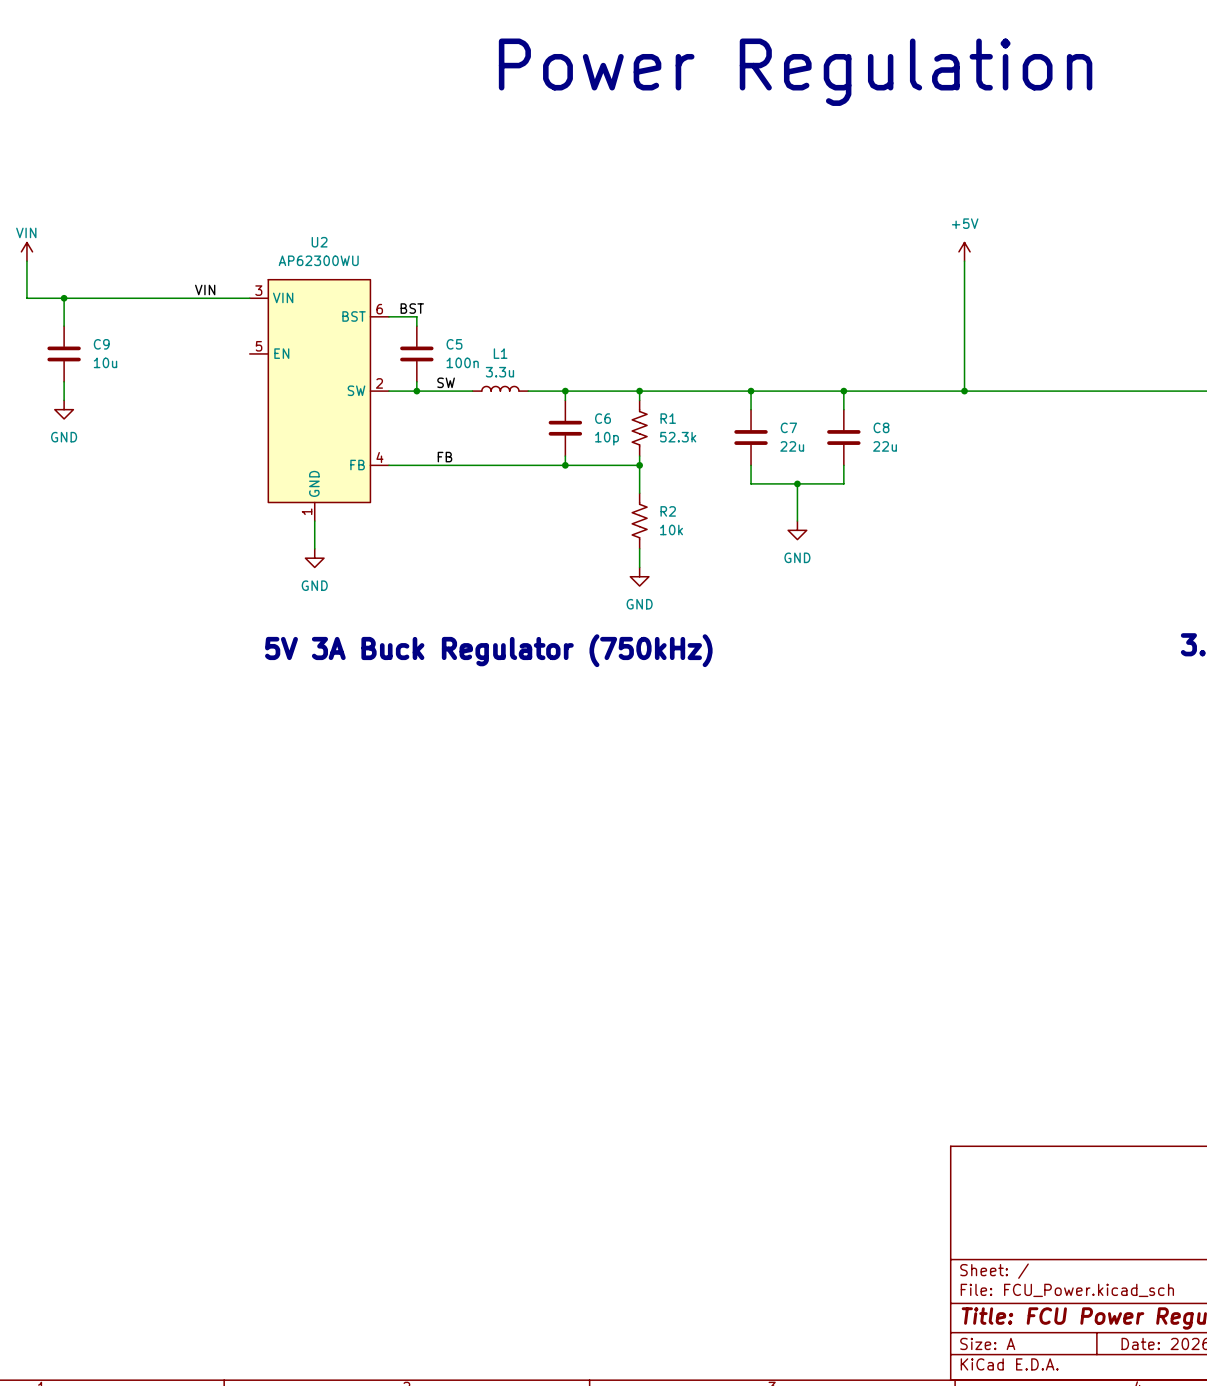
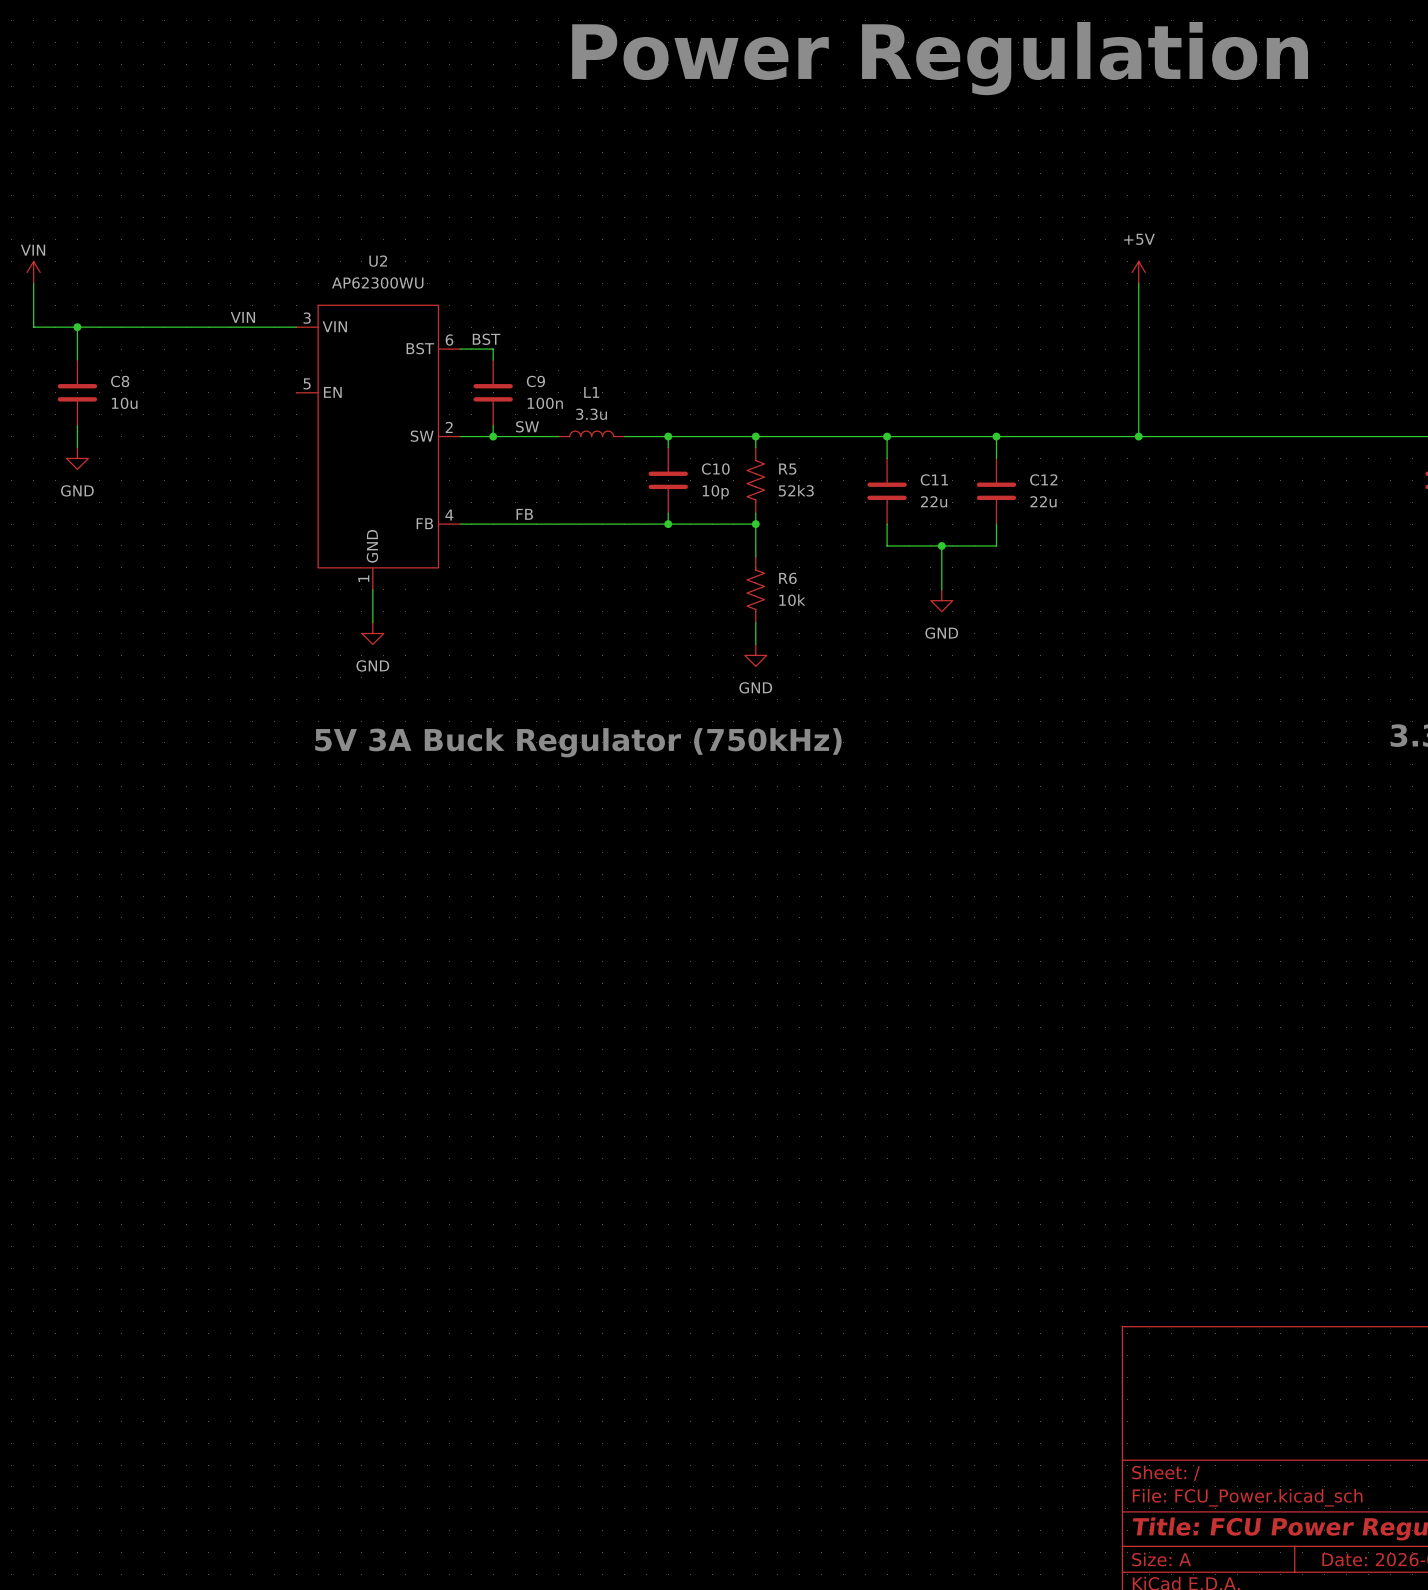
C9 name: C9 (101, 344) -> C8 (120, 381)
C5 name: C5 (454, 344) -> C9 (535, 381)
C6 name: C6 (603, 418) -> C10 (715, 468)
R1 name: R1 (668, 418) -> R5 (787, 469)
C7 name: C7 (788, 427) -> C11 (934, 479)
C8 name: C8 (881, 427) -> C12 (1043, 479)
R1 value: 52.3k (678, 437) -> 52k3 (796, 490)
R2 name: R2 (668, 511) -> R6 (787, 578)

